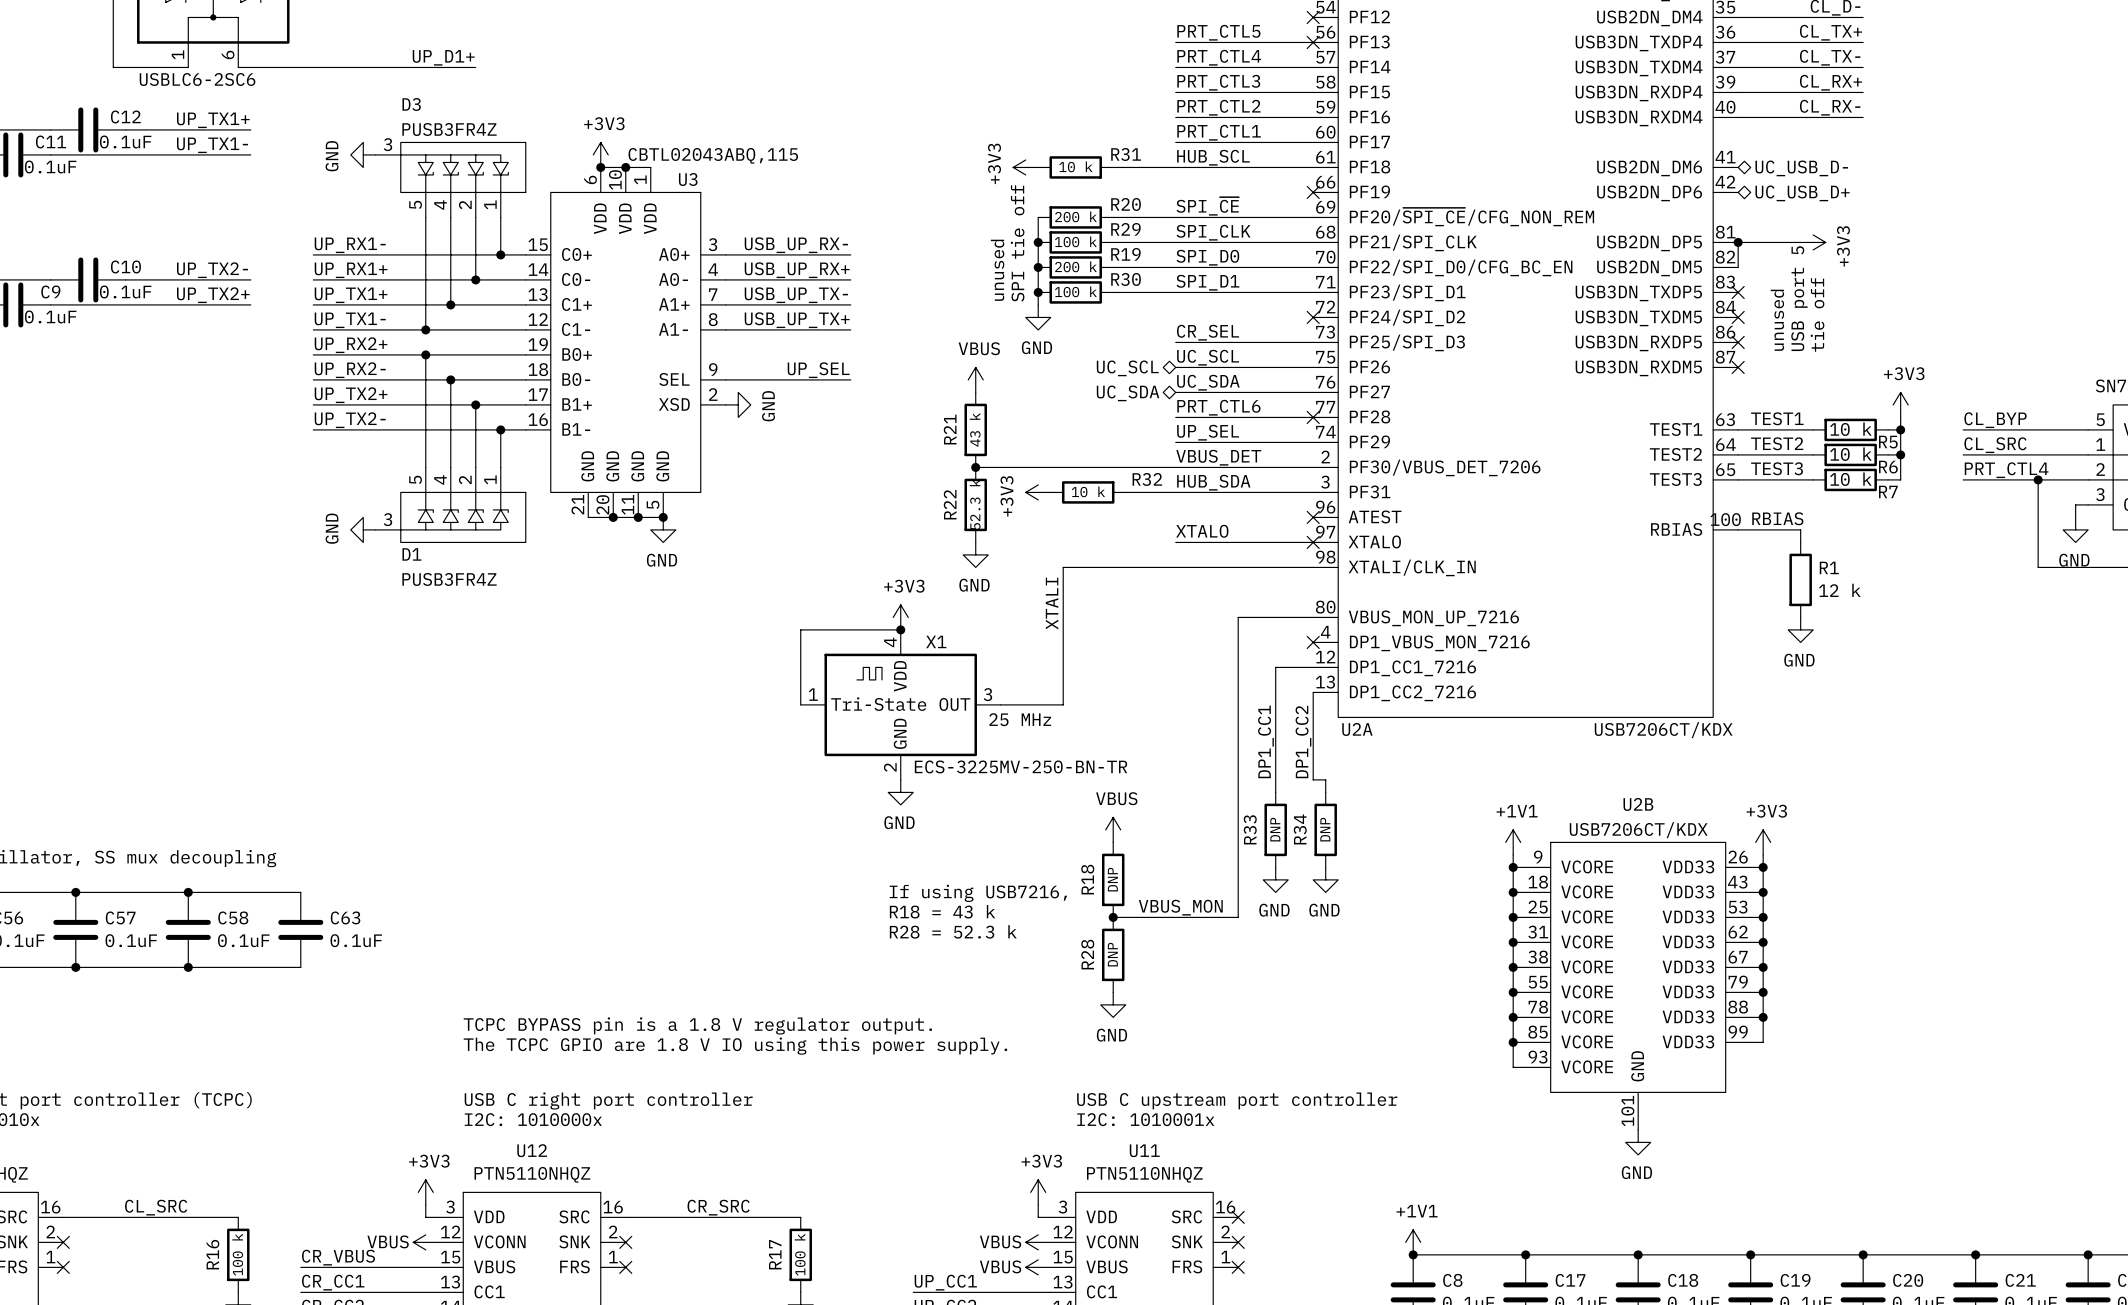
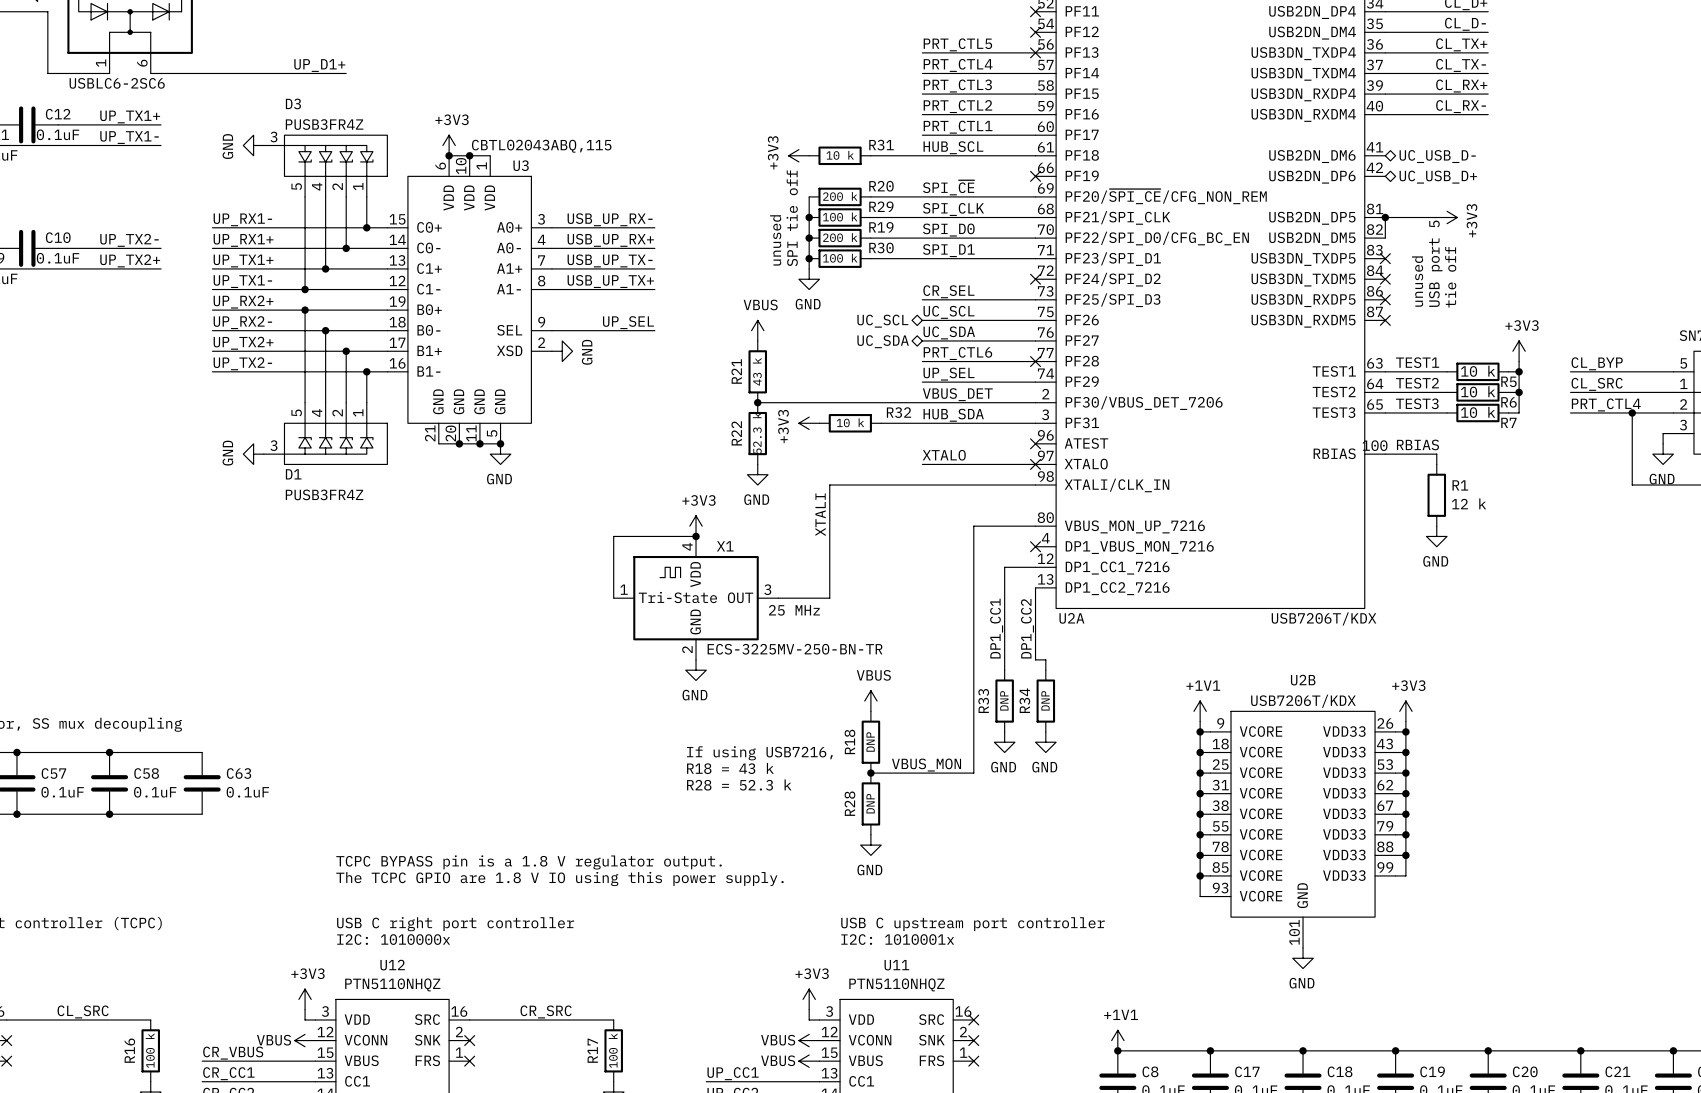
U2A value: USB7206CT/KDX (1663, 730) -> USB7206T/KDX (1324, 618)
U2B value: USB7206CT/KDX (1638, 830) -> USB7206T/KDX (1303, 701)

